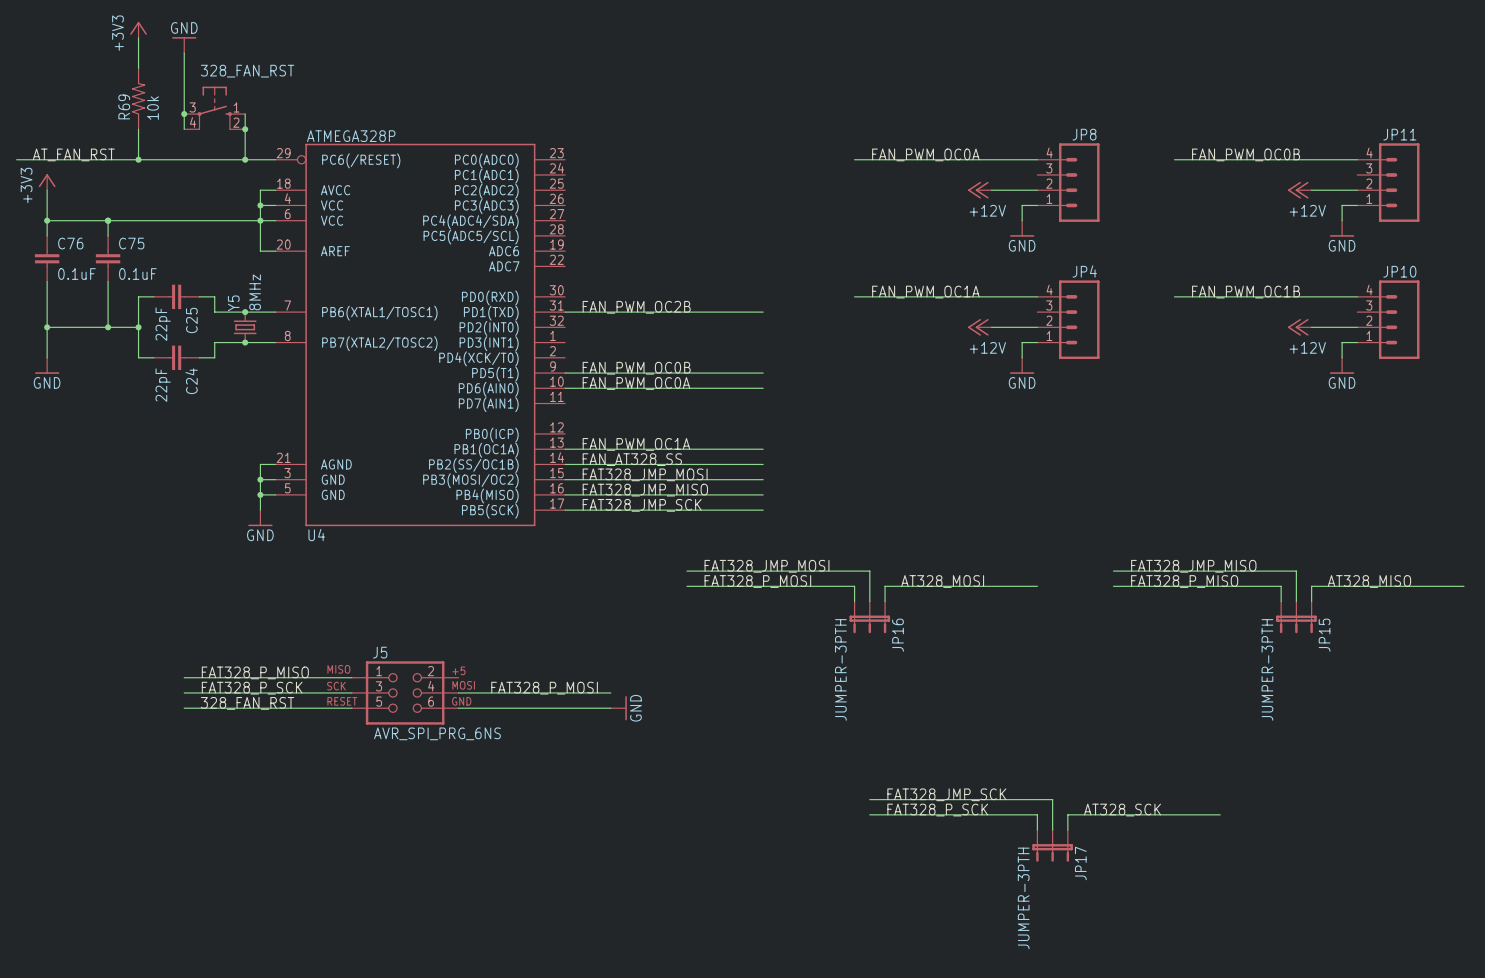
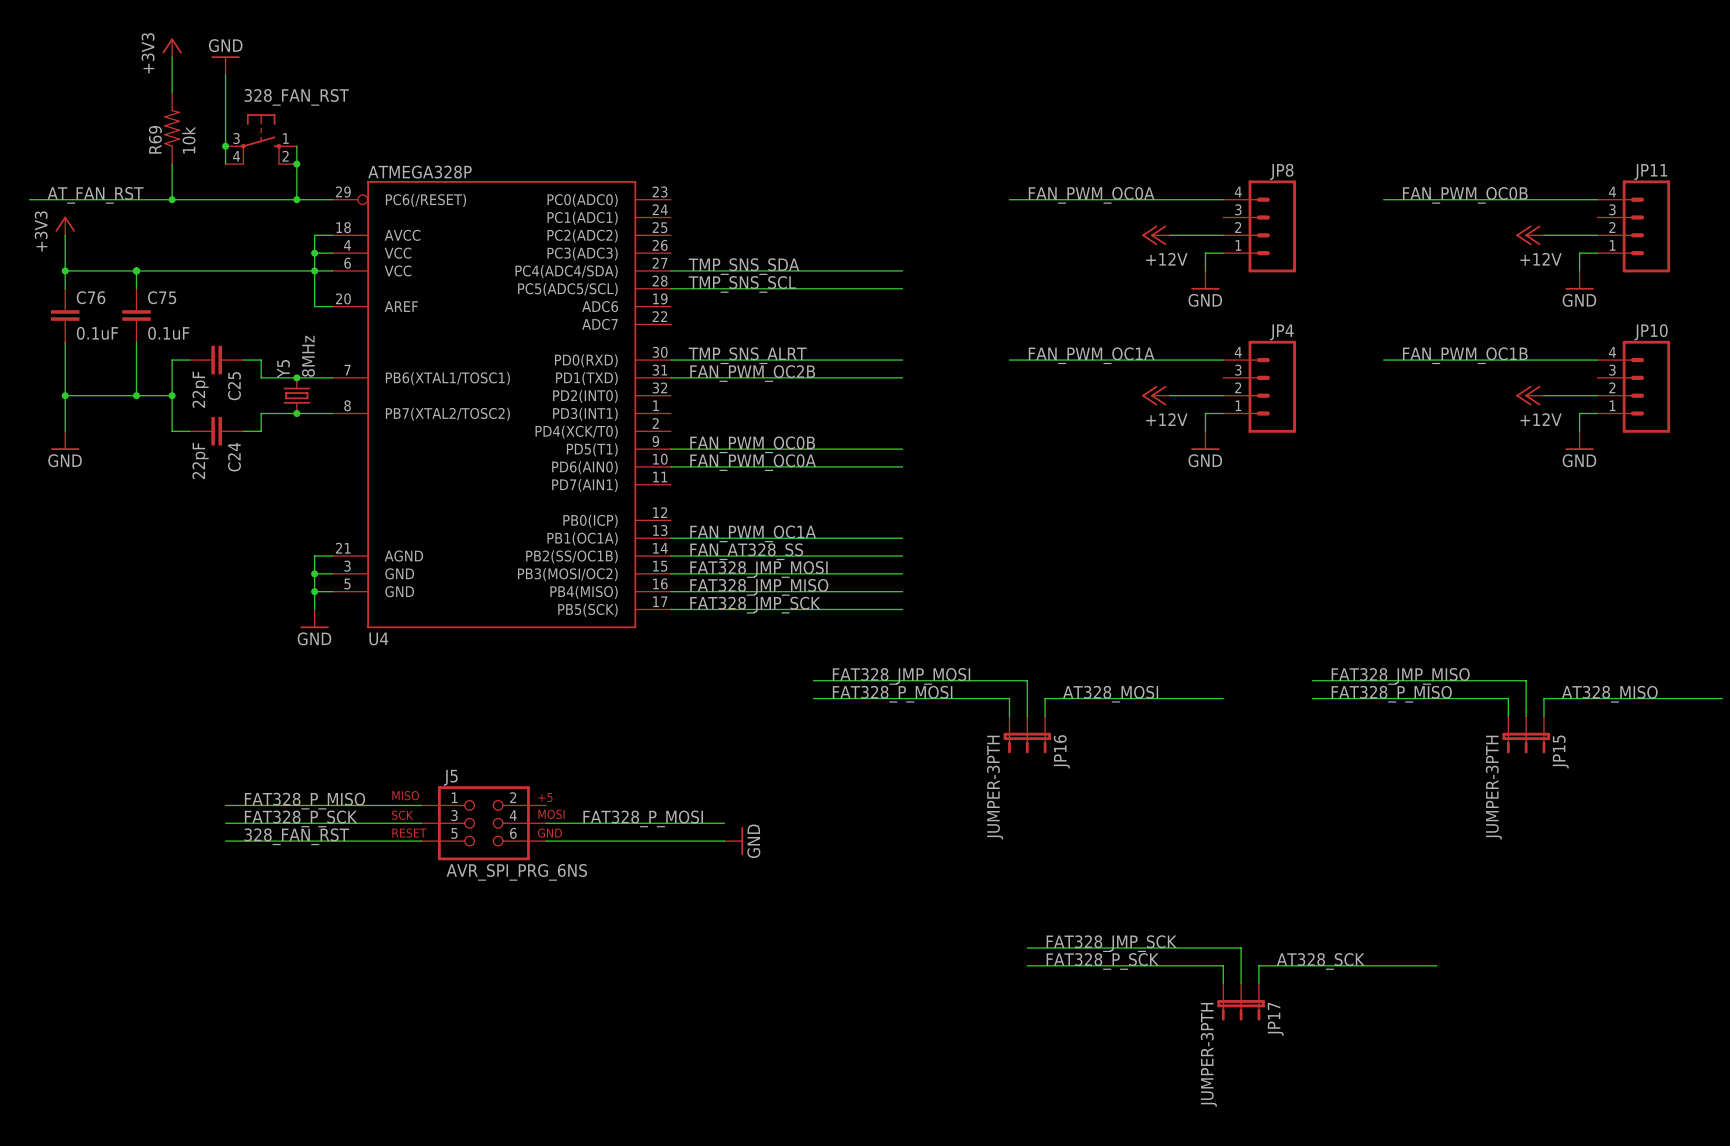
label: none -> TMP_SNS_SDA (744, 266)
wire: none -> (670, 270) (902, 270)
label: none -> TMP_SNS_SCL (742, 284)
wire: none -> (670, 288) (902, 288)
label: none -> TMP_SNS_ALRT (747, 355)
wire: none -> (670, 360) (902, 360)

